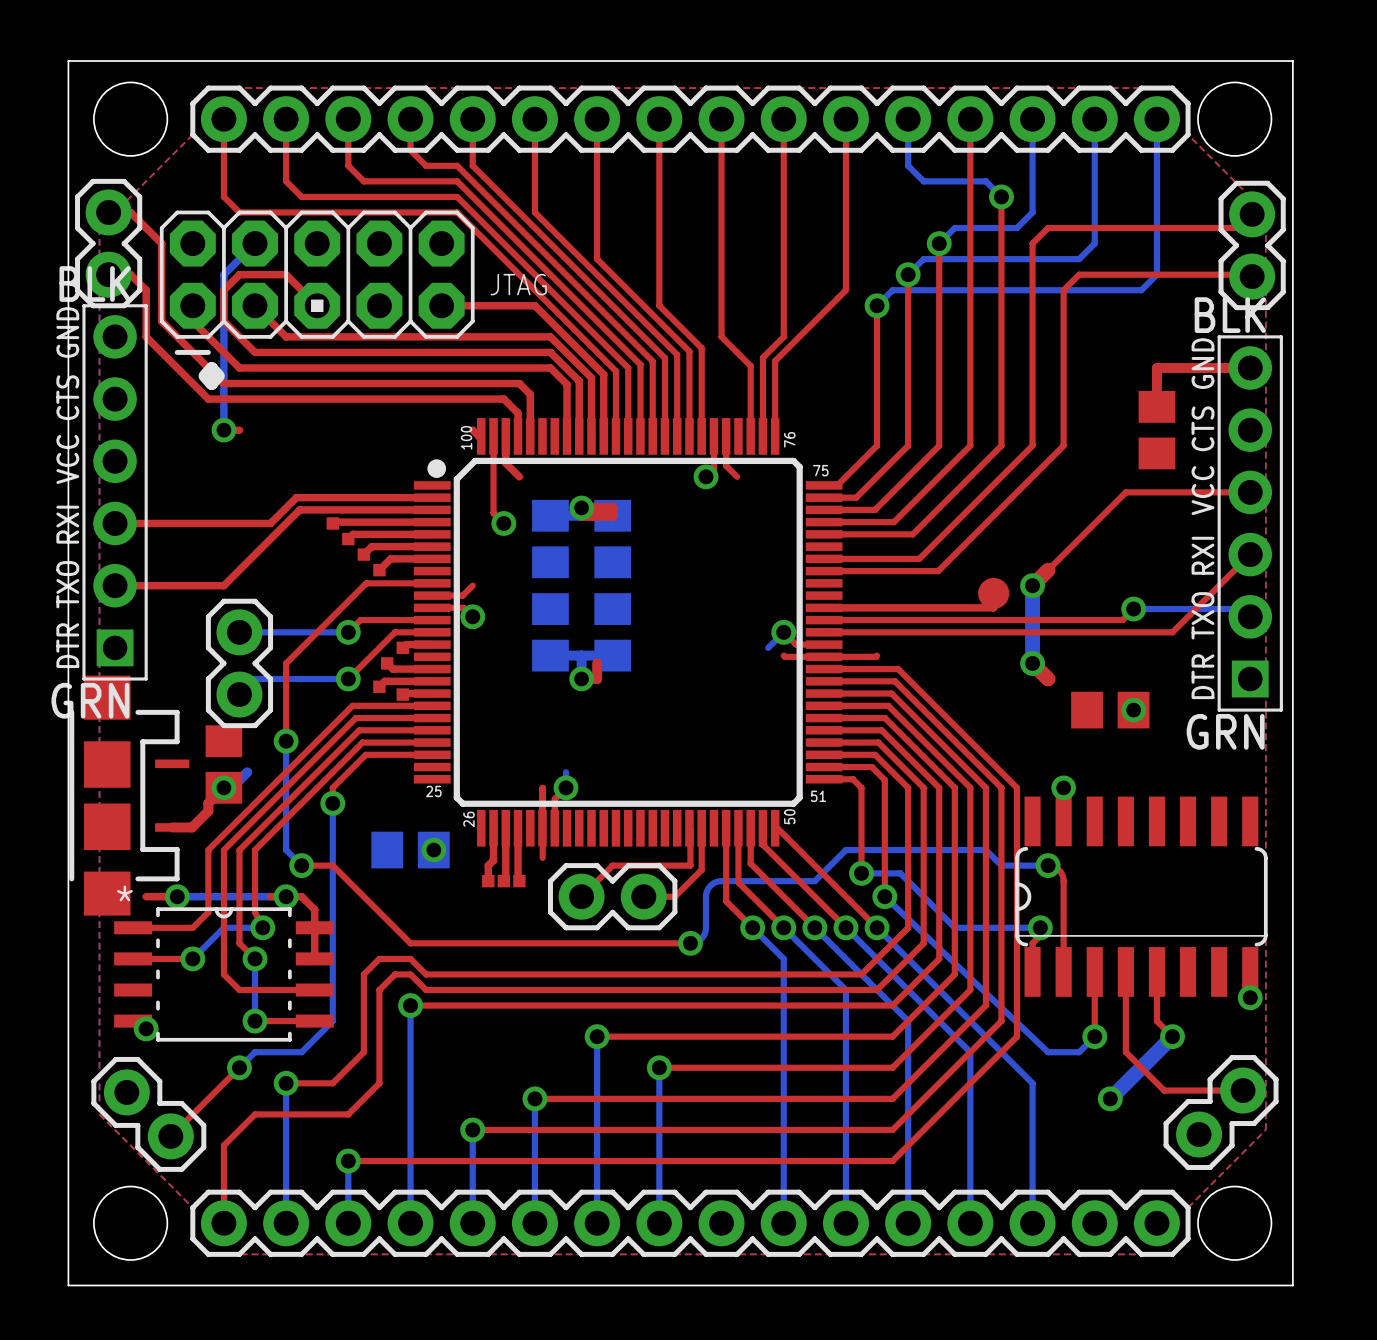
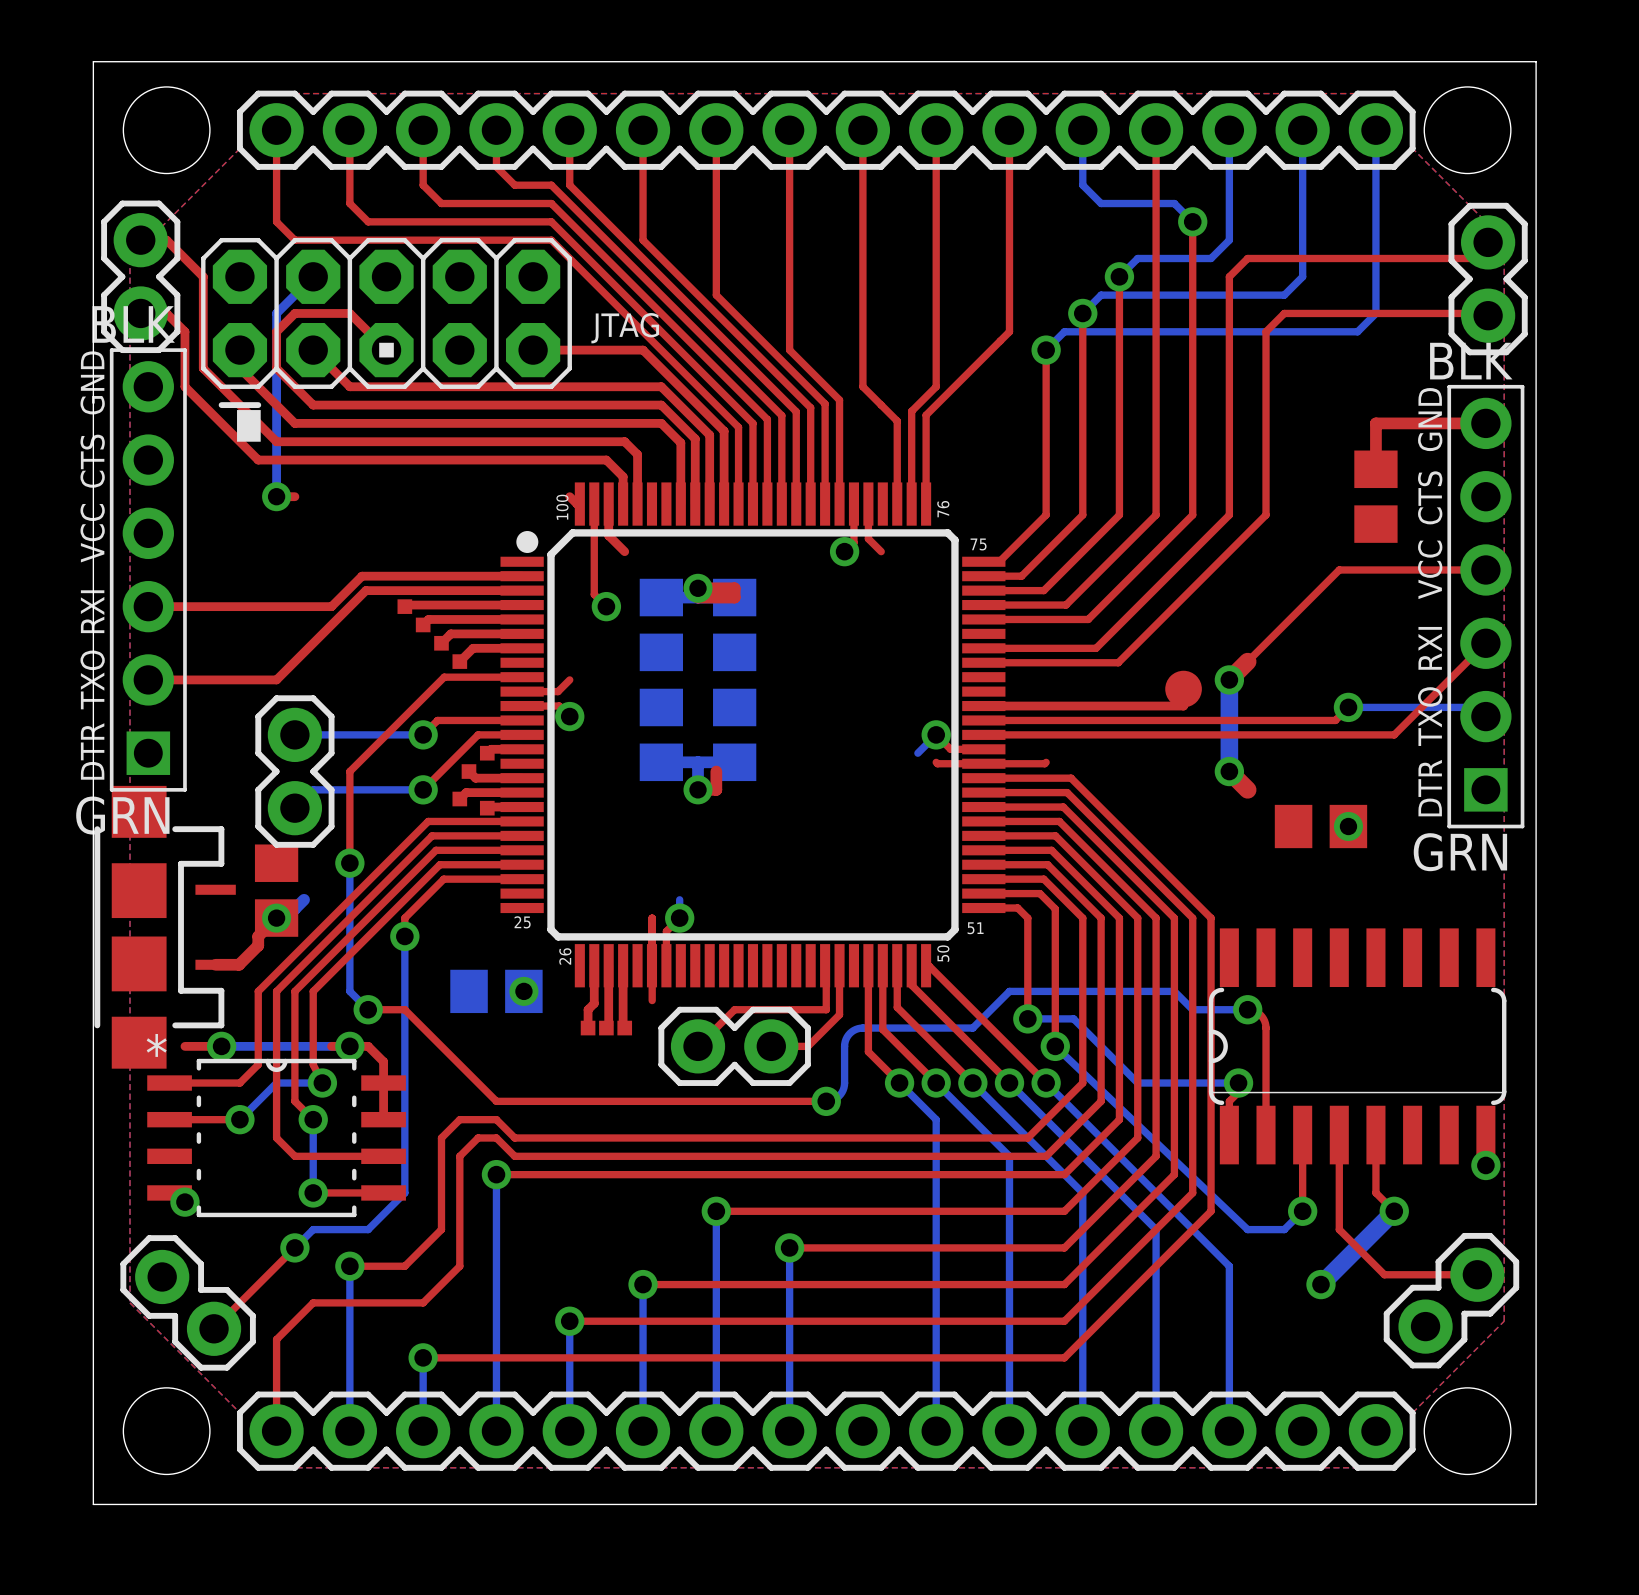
via: (1063, 787) -> none

